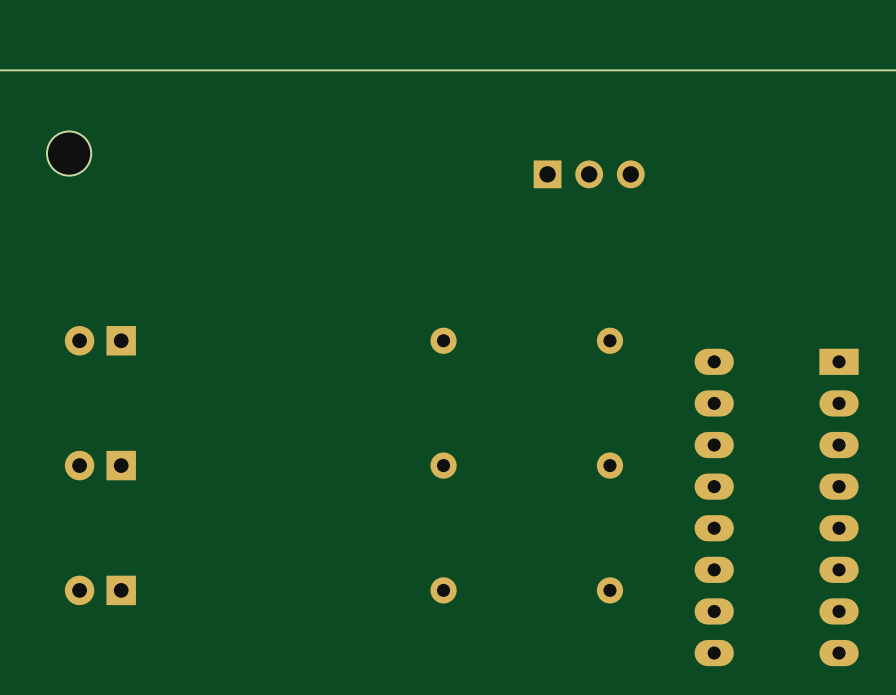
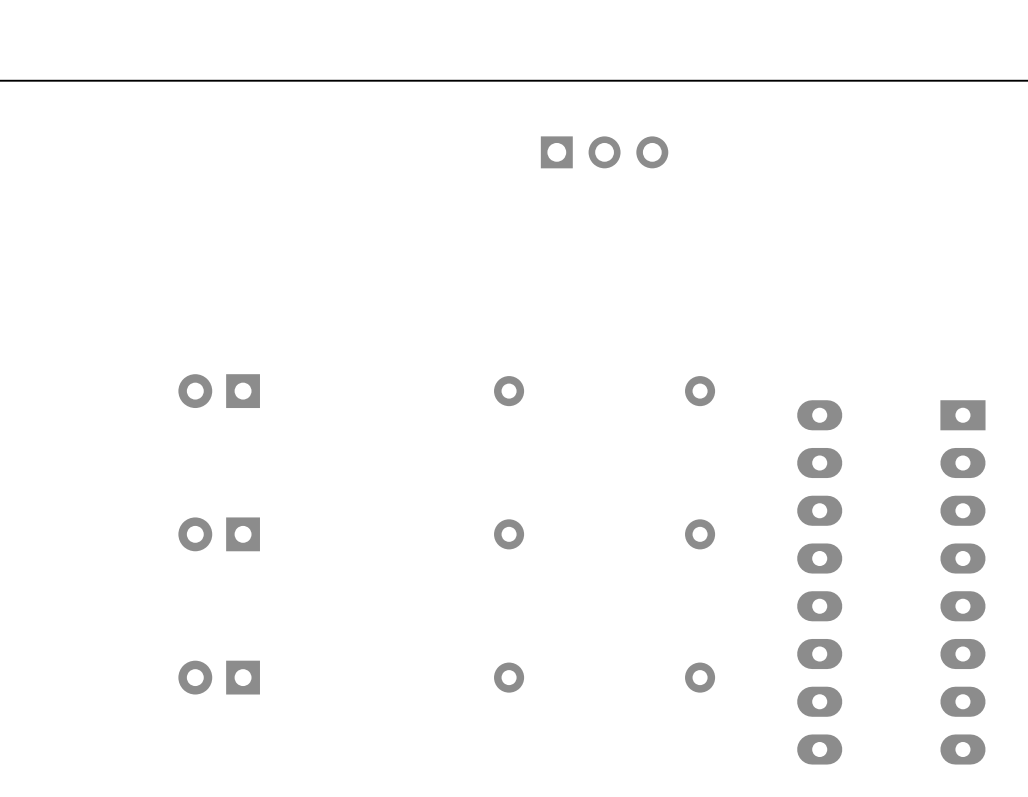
part: (69, 153) -> none
part position: (589, 174) -> (604, 152)
part: (100, 340) -> none
part: none -> (219, 391)
part: (100, 465) -> none
part: none -> (219, 534)
part: (100, 590) -> none
part: none -> (219, 677)

